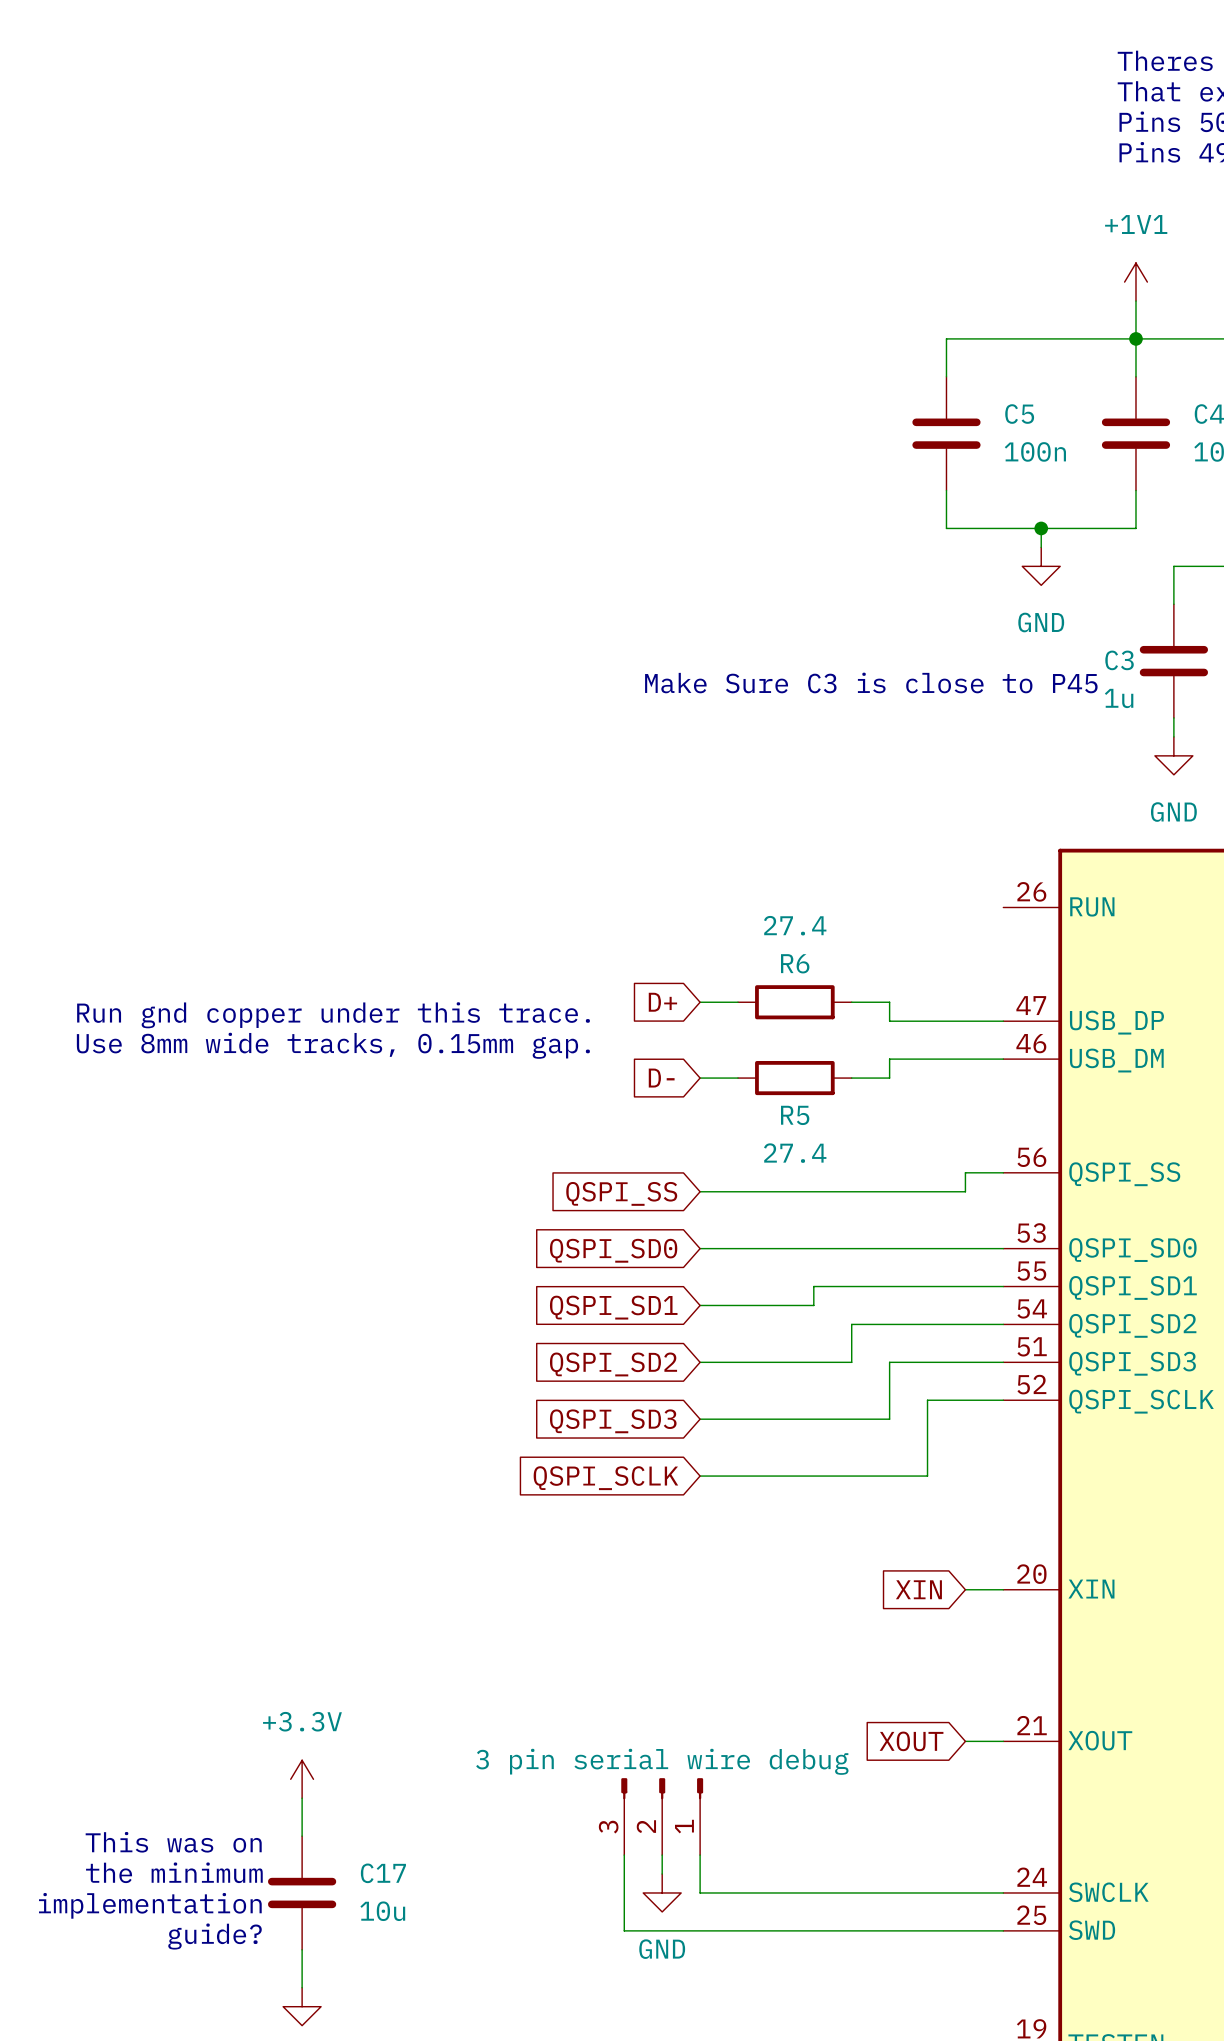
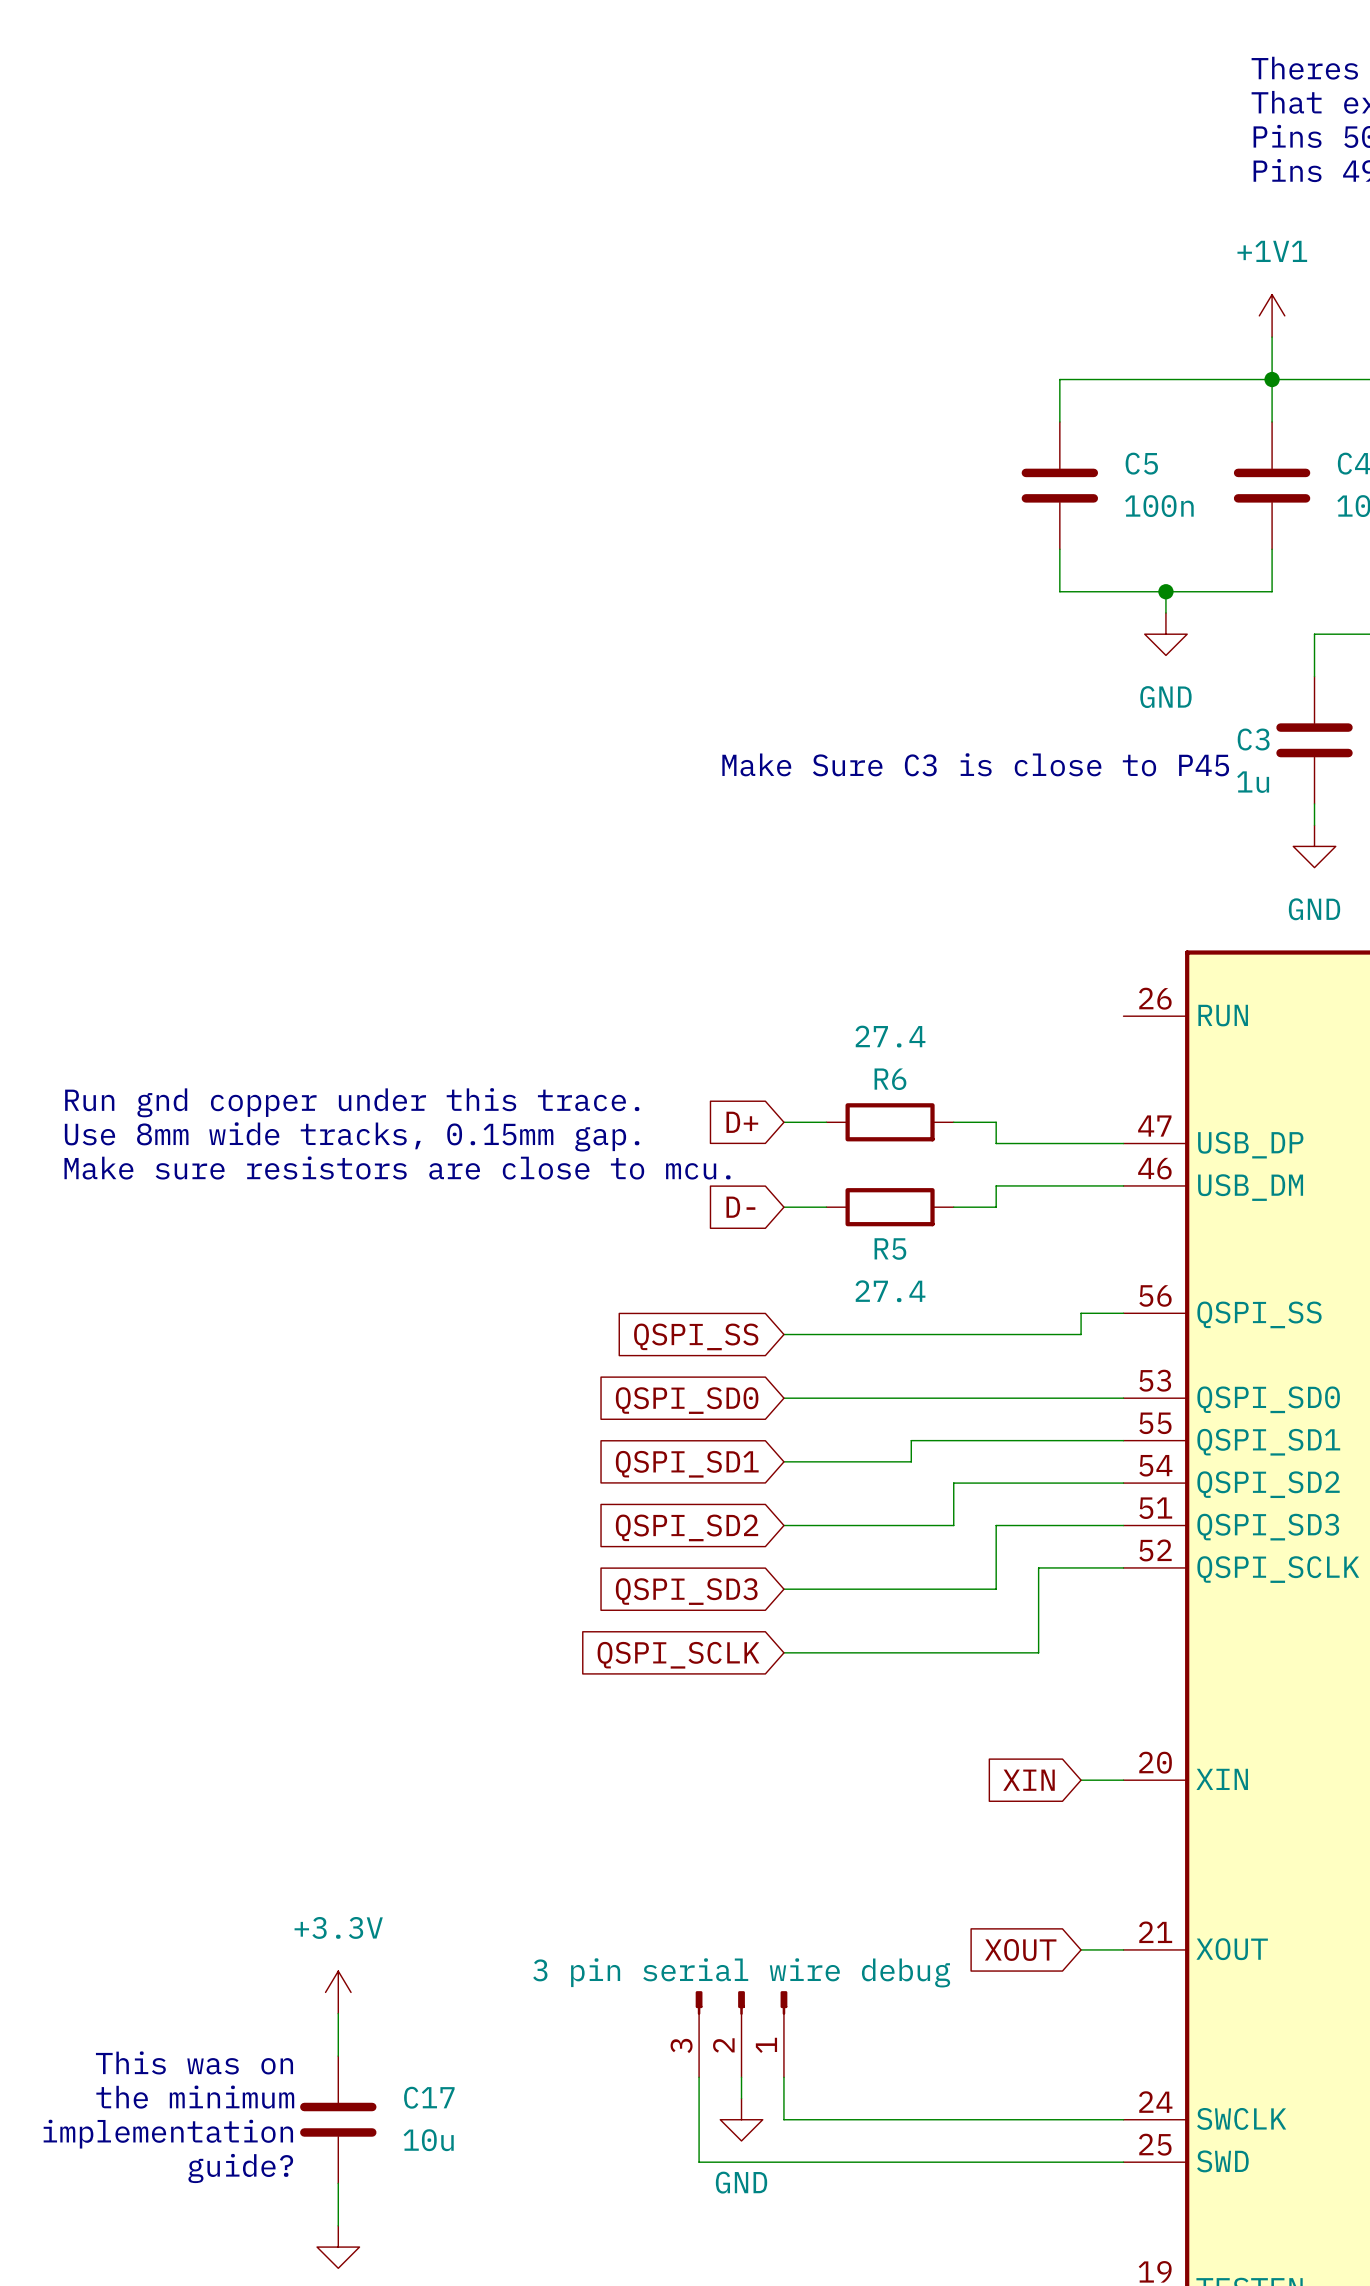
text position: Run gnd copper under this trace. (333, 1015) -> Run gnd copper under this trace. (352, 1102)
text: none -> Make sure resistors are close to mcu. (397, 1168)
text position: Use 8mm wide tracks, 0.15mm gap. (333, 1045) -> Use 8mm wide tracks, 0.15mm gap. (352, 1136)

